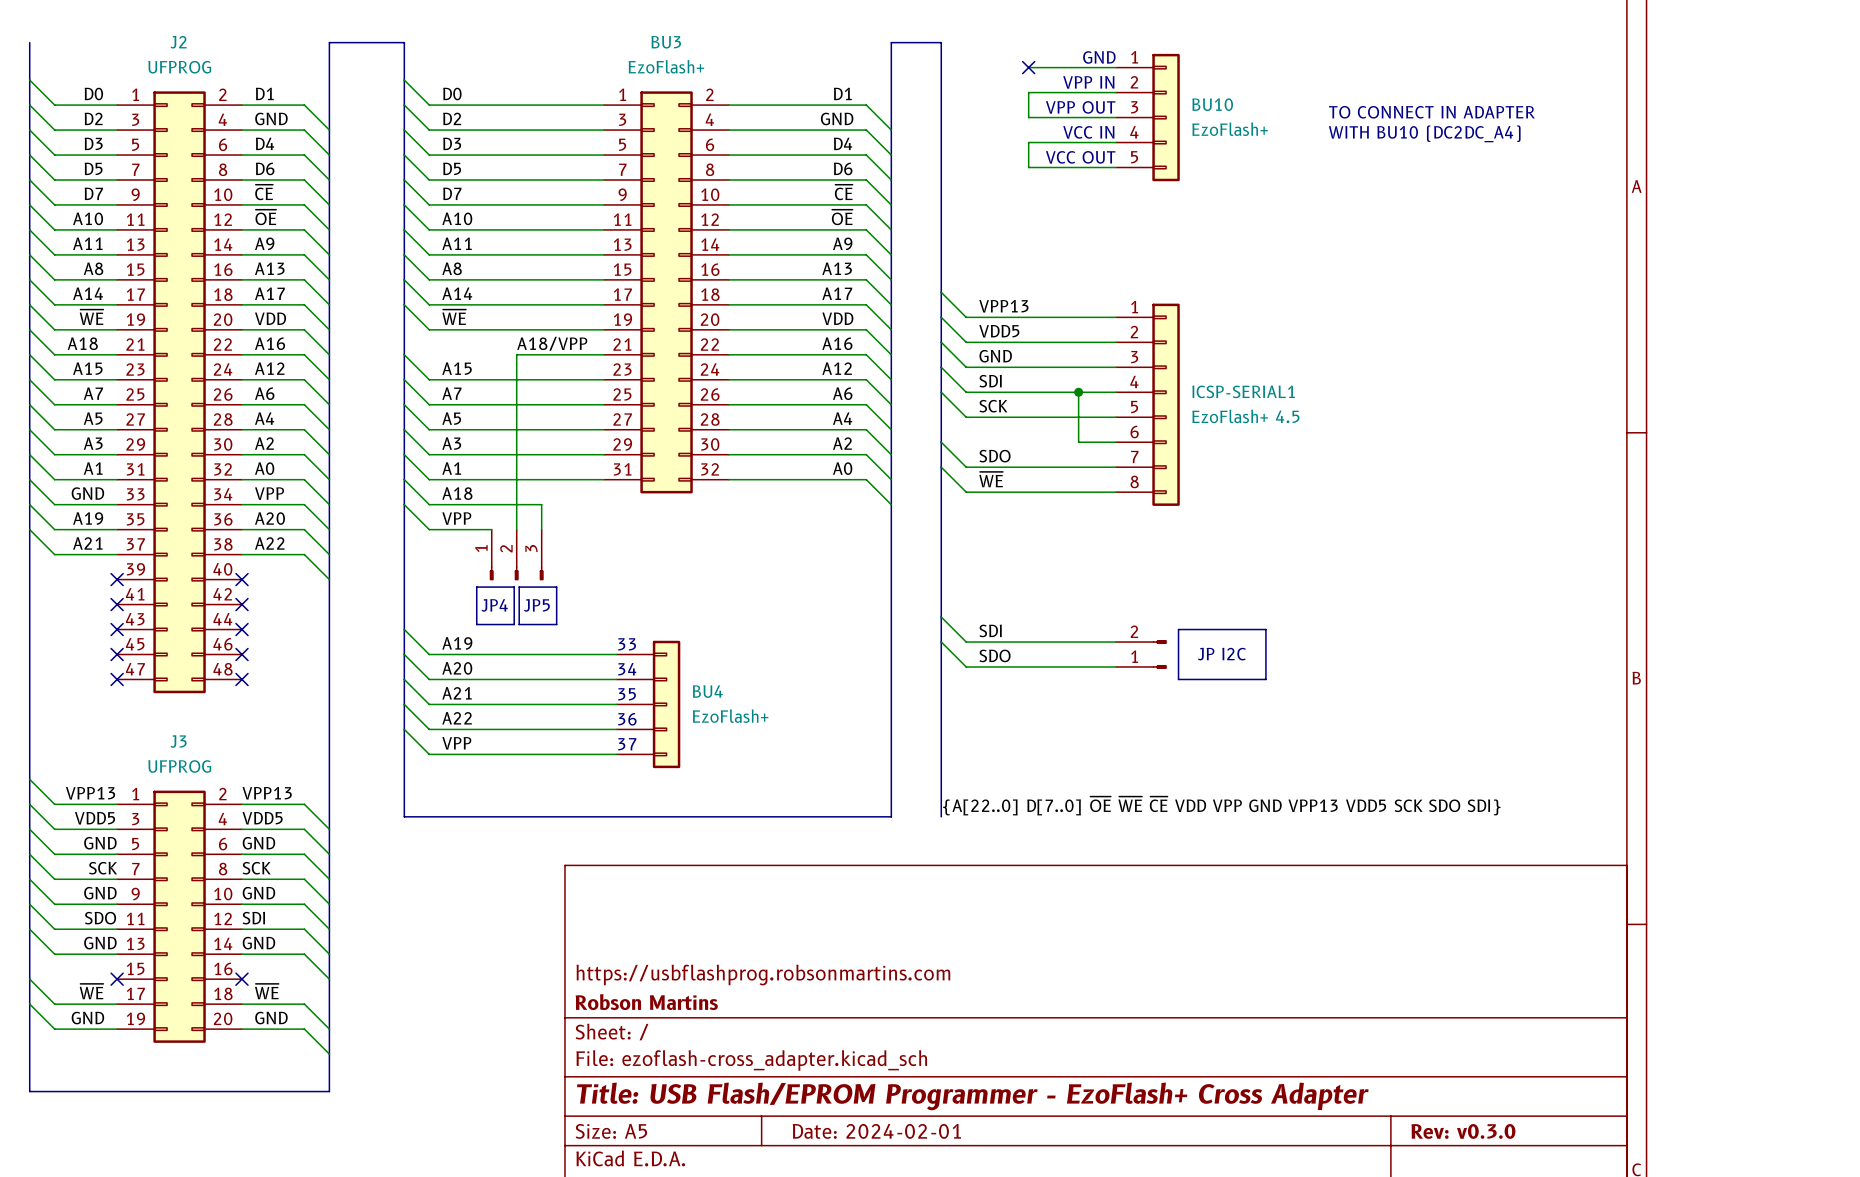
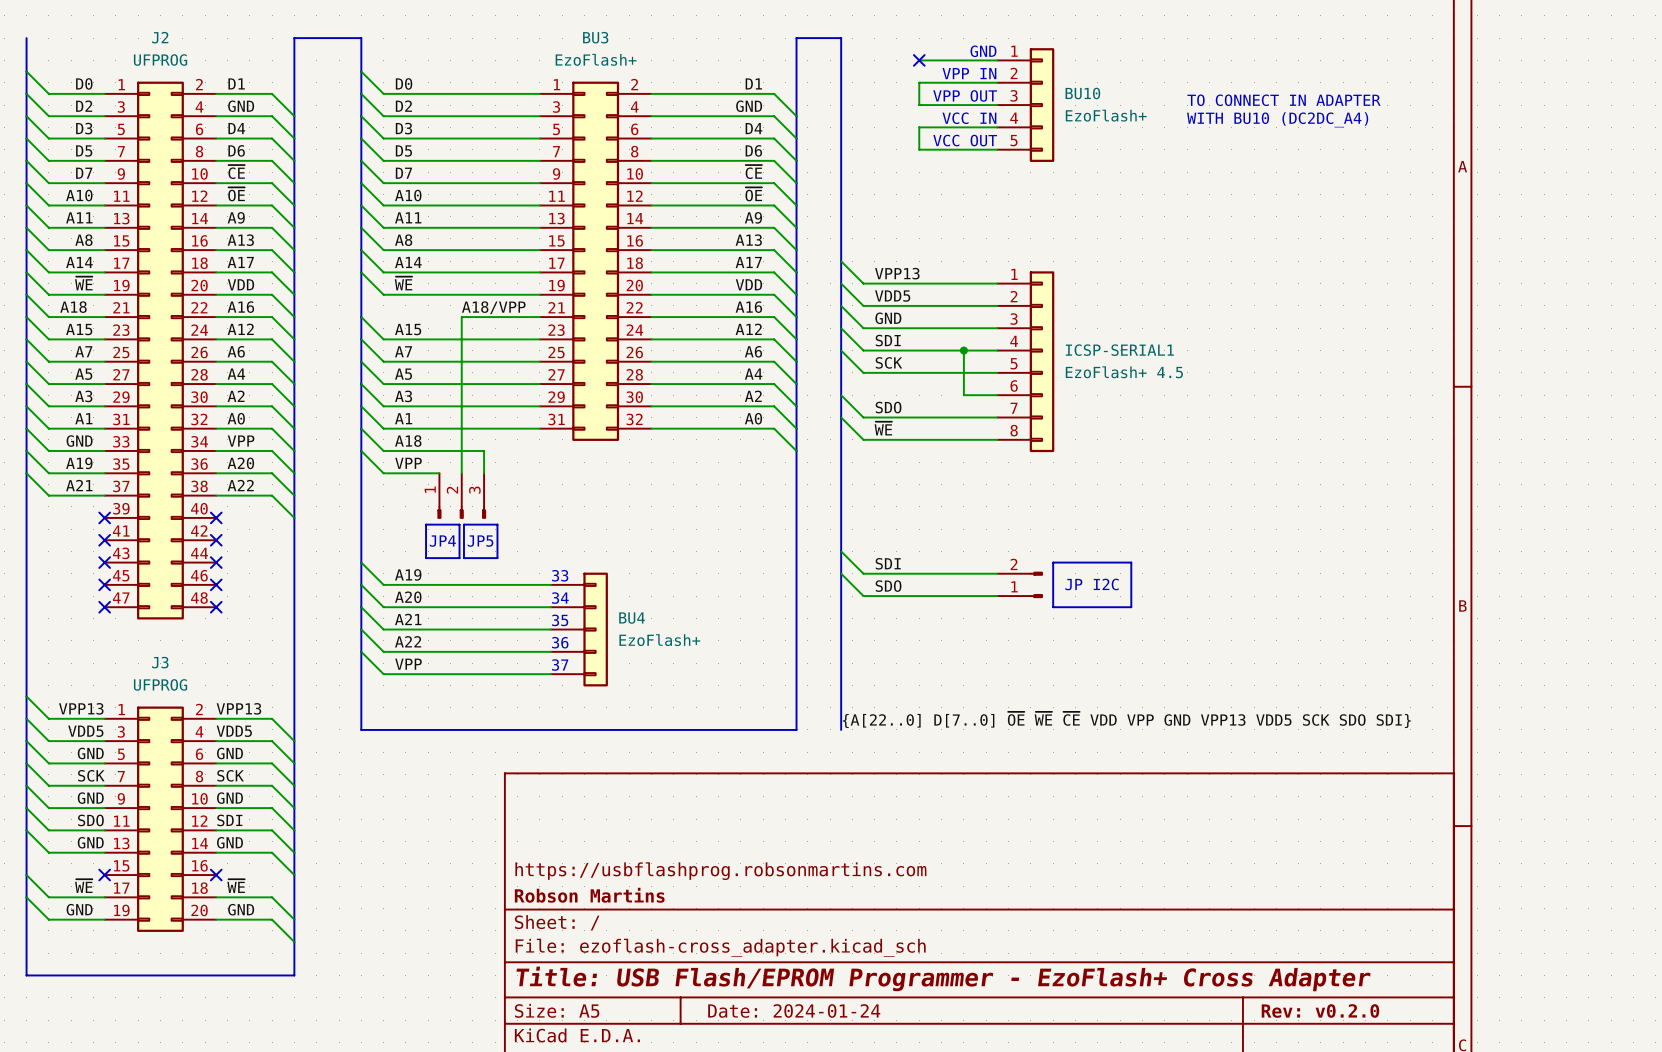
title block: Date: 2024-02-01 (876, 1131) -> Date: 2024-01-24 (794, 1011)
title block: Rev: v0.3.0 (1463, 1131) -> Rev: v0.2.0 (1320, 1011)

